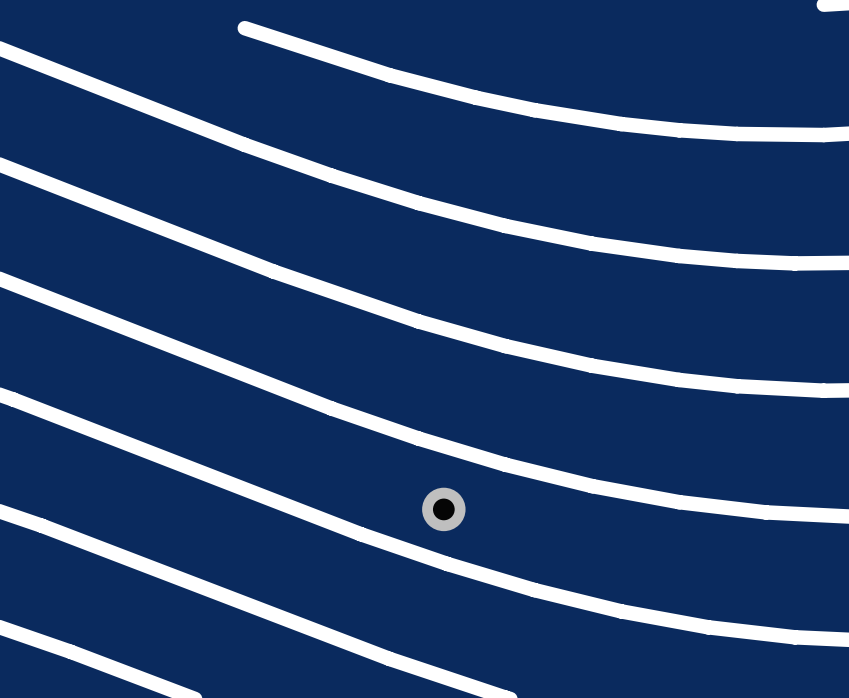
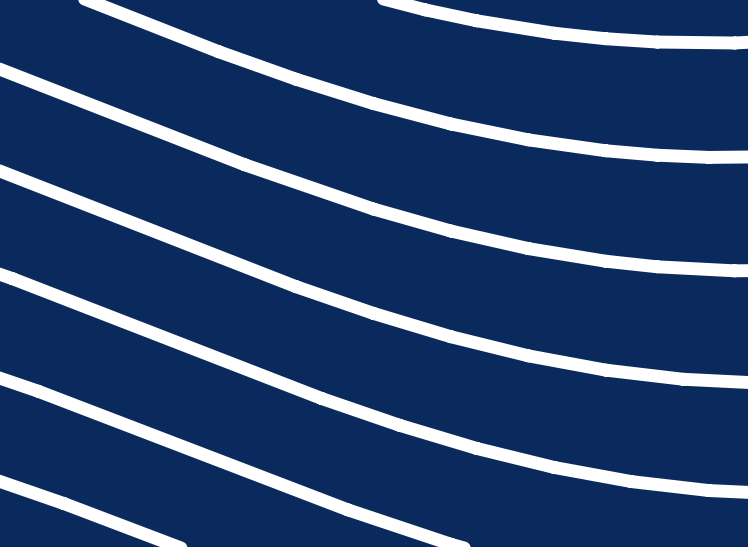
via: (443, 509) -> none

